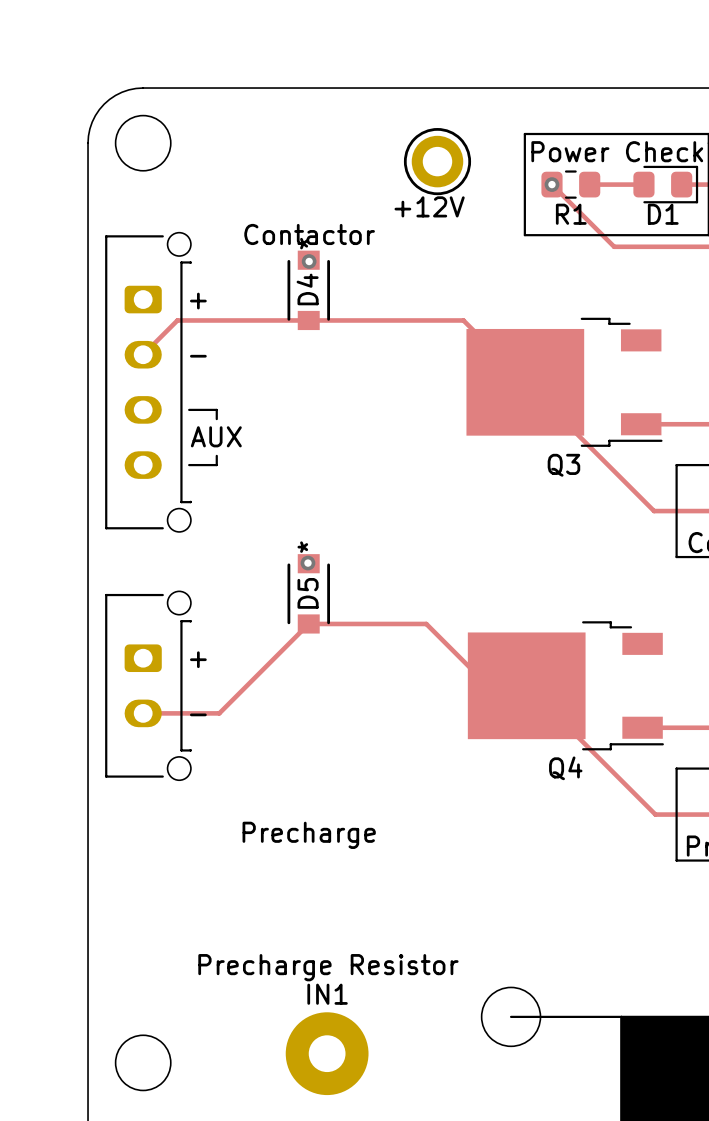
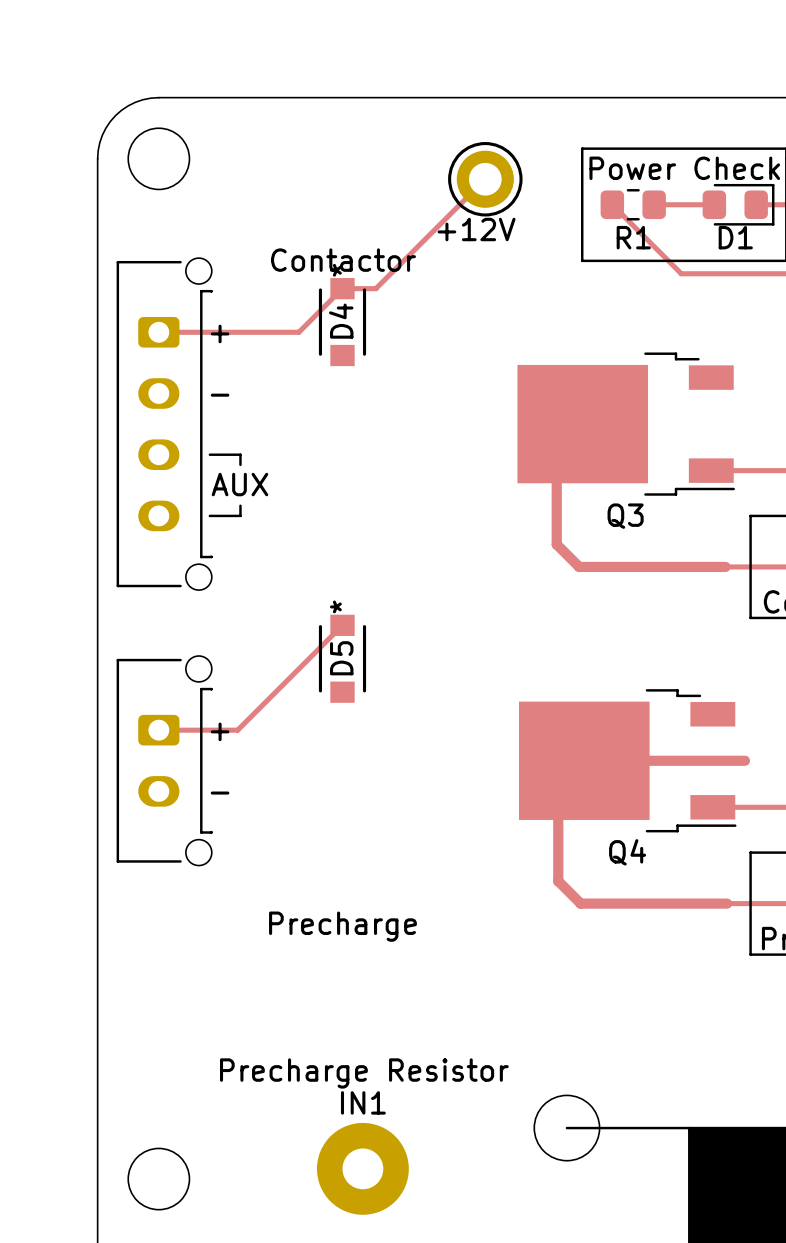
track: none -> (485, 179) (375, 288) (342, 288) (298, 332) (158, 332)
via: (551, 184) -> none
via: (309, 261) -> none
track: (143, 354) (177, 320) (463, 320) (654, 511) -> (556, 424) (556, 544) (579, 566) (725, 566)
via: (307, 563) -> none
track: none -> (342, 625) (237, 730) (158, 730)
track: (503, 685) (488, 685) (426, 623) (308, 623) (219, 713) (143, 713) -> none
track: (526, 685) (655, 814) -> (558, 760) (558, 881) (580, 903) (727, 903)
track: none -> (584, 760) (744, 760)

